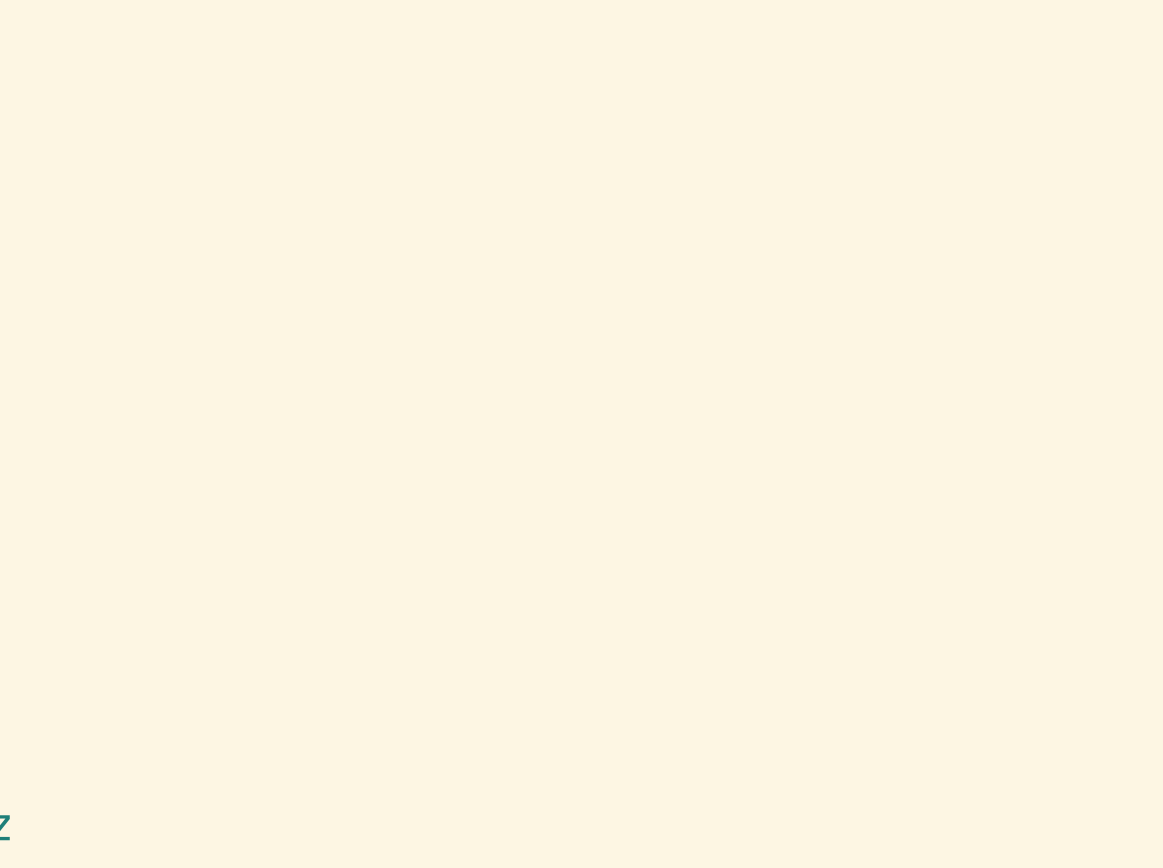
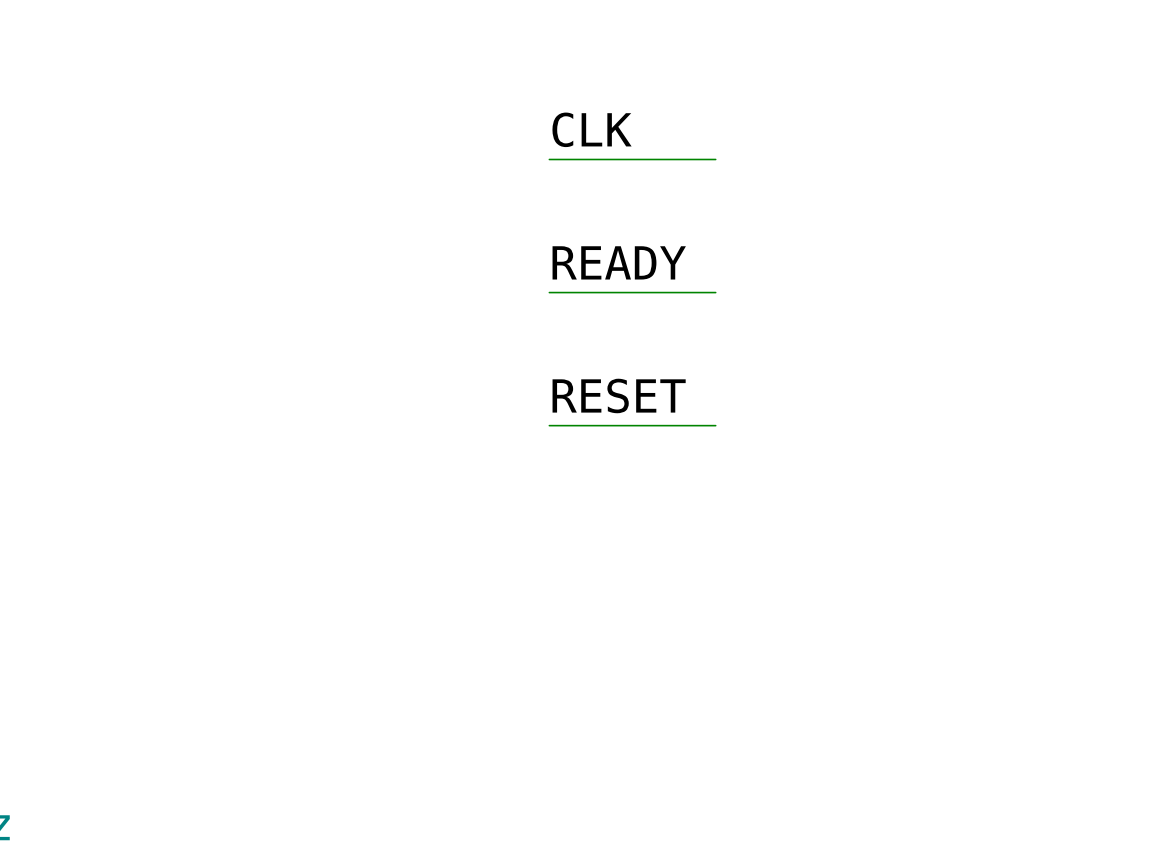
label: none -> CLK (592, 129)
wire: none -> (549, 159) (715, 159)
label: none -> READY (619, 262)
wire: none -> (549, 292) (715, 292)
label: none -> RESET (619, 395)
wire: none -> (549, 425) (715, 425)

